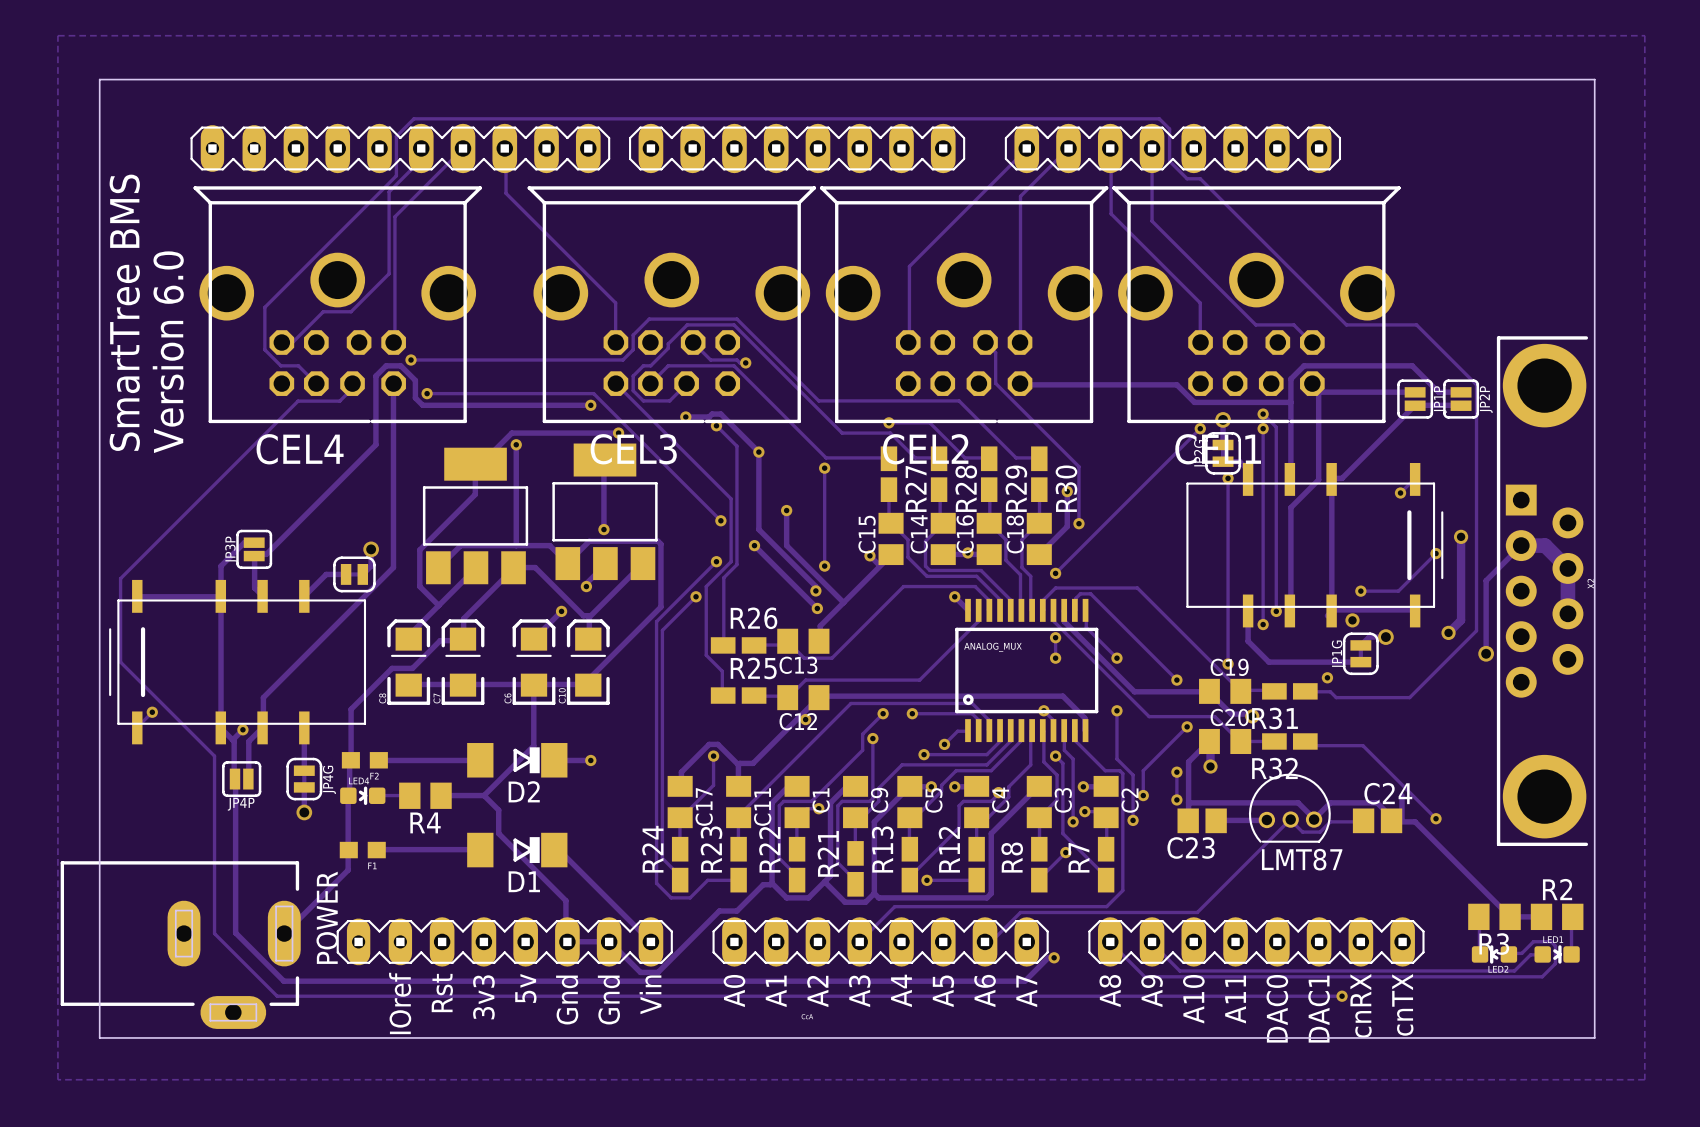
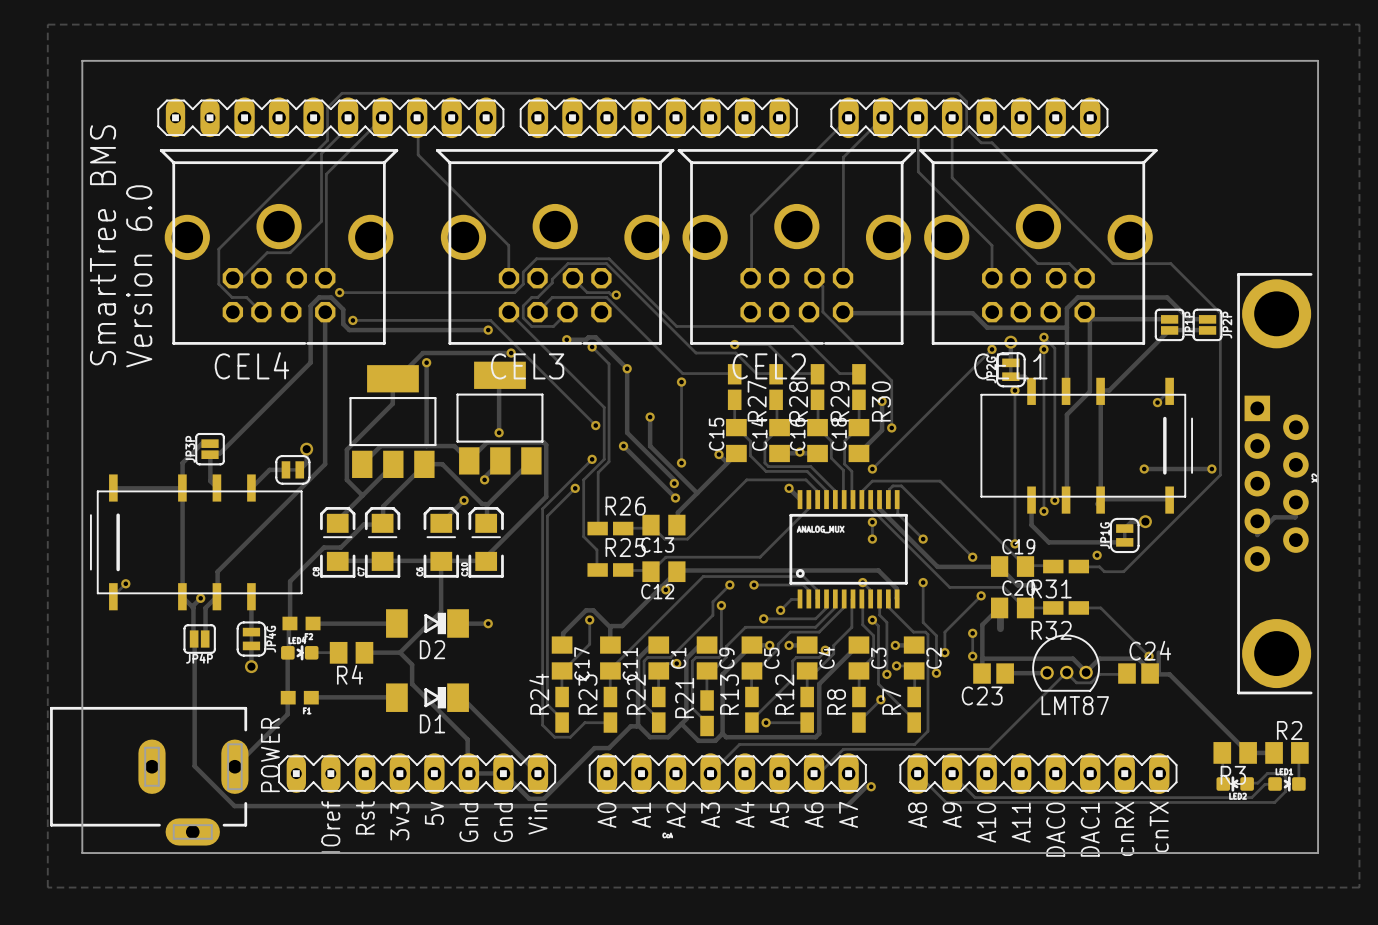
track: (352, 383) (350, 390) (339, 401) (298, 401) (120, 578) (120, 662) (214, 756) (214, 933) (277, 996) (1342, 996) -> none
track: (1461, 536) (1461, 620) (1448, 632) -> none
via: (1461, 536) -> none
track: (1436, 553) (1398, 591) (1360, 591) -> none
via: (1436, 553) -> none
track: none -> (1144, 469) (1211, 469)
via: none -> (1144, 469)
via: none -> (1211, 469)
track: (1476, 580) (1476, 630) (1409, 697) (1359, 697) -> (1220, 475) (1123, 571)
via: (1360, 591) -> none
track: (1567, 613) (1567, 568) (1545, 545) (1521, 545) (1486, 580) (1486, 653) -> none
via: (1352, 620) -> none
track: none -> (1295, 516) (1274, 517) (1257, 535)
via: (1448, 632) -> none
via: (1486, 653) -> none
via: (1252, 716) -> none
track: (1305, 741) (1310, 745) (1362, 745) (1436, 818) -> (1078, 607) (1100, 607) (1149, 656)
via: (1210, 766) -> none
via position: (1436, 818) -> (1149, 656)
via: (1342, 996) -> none

